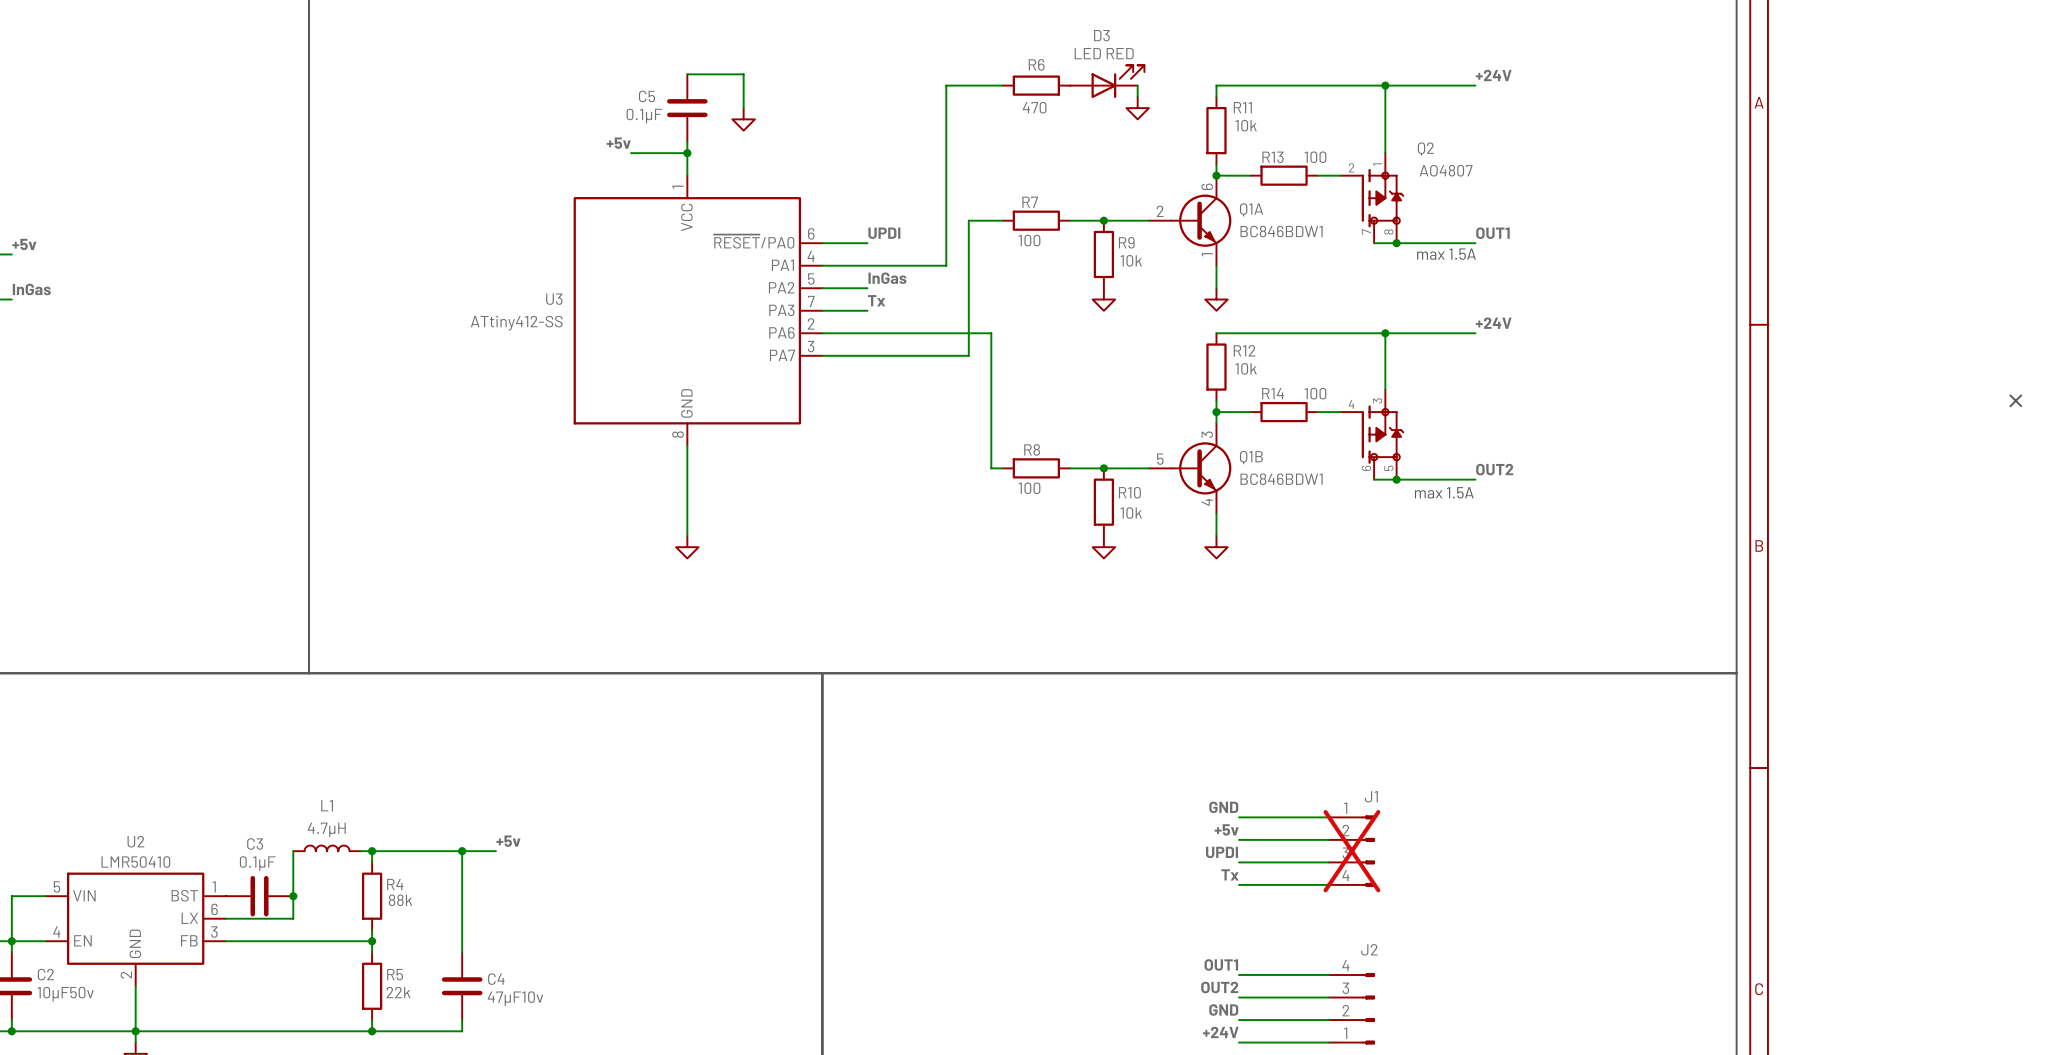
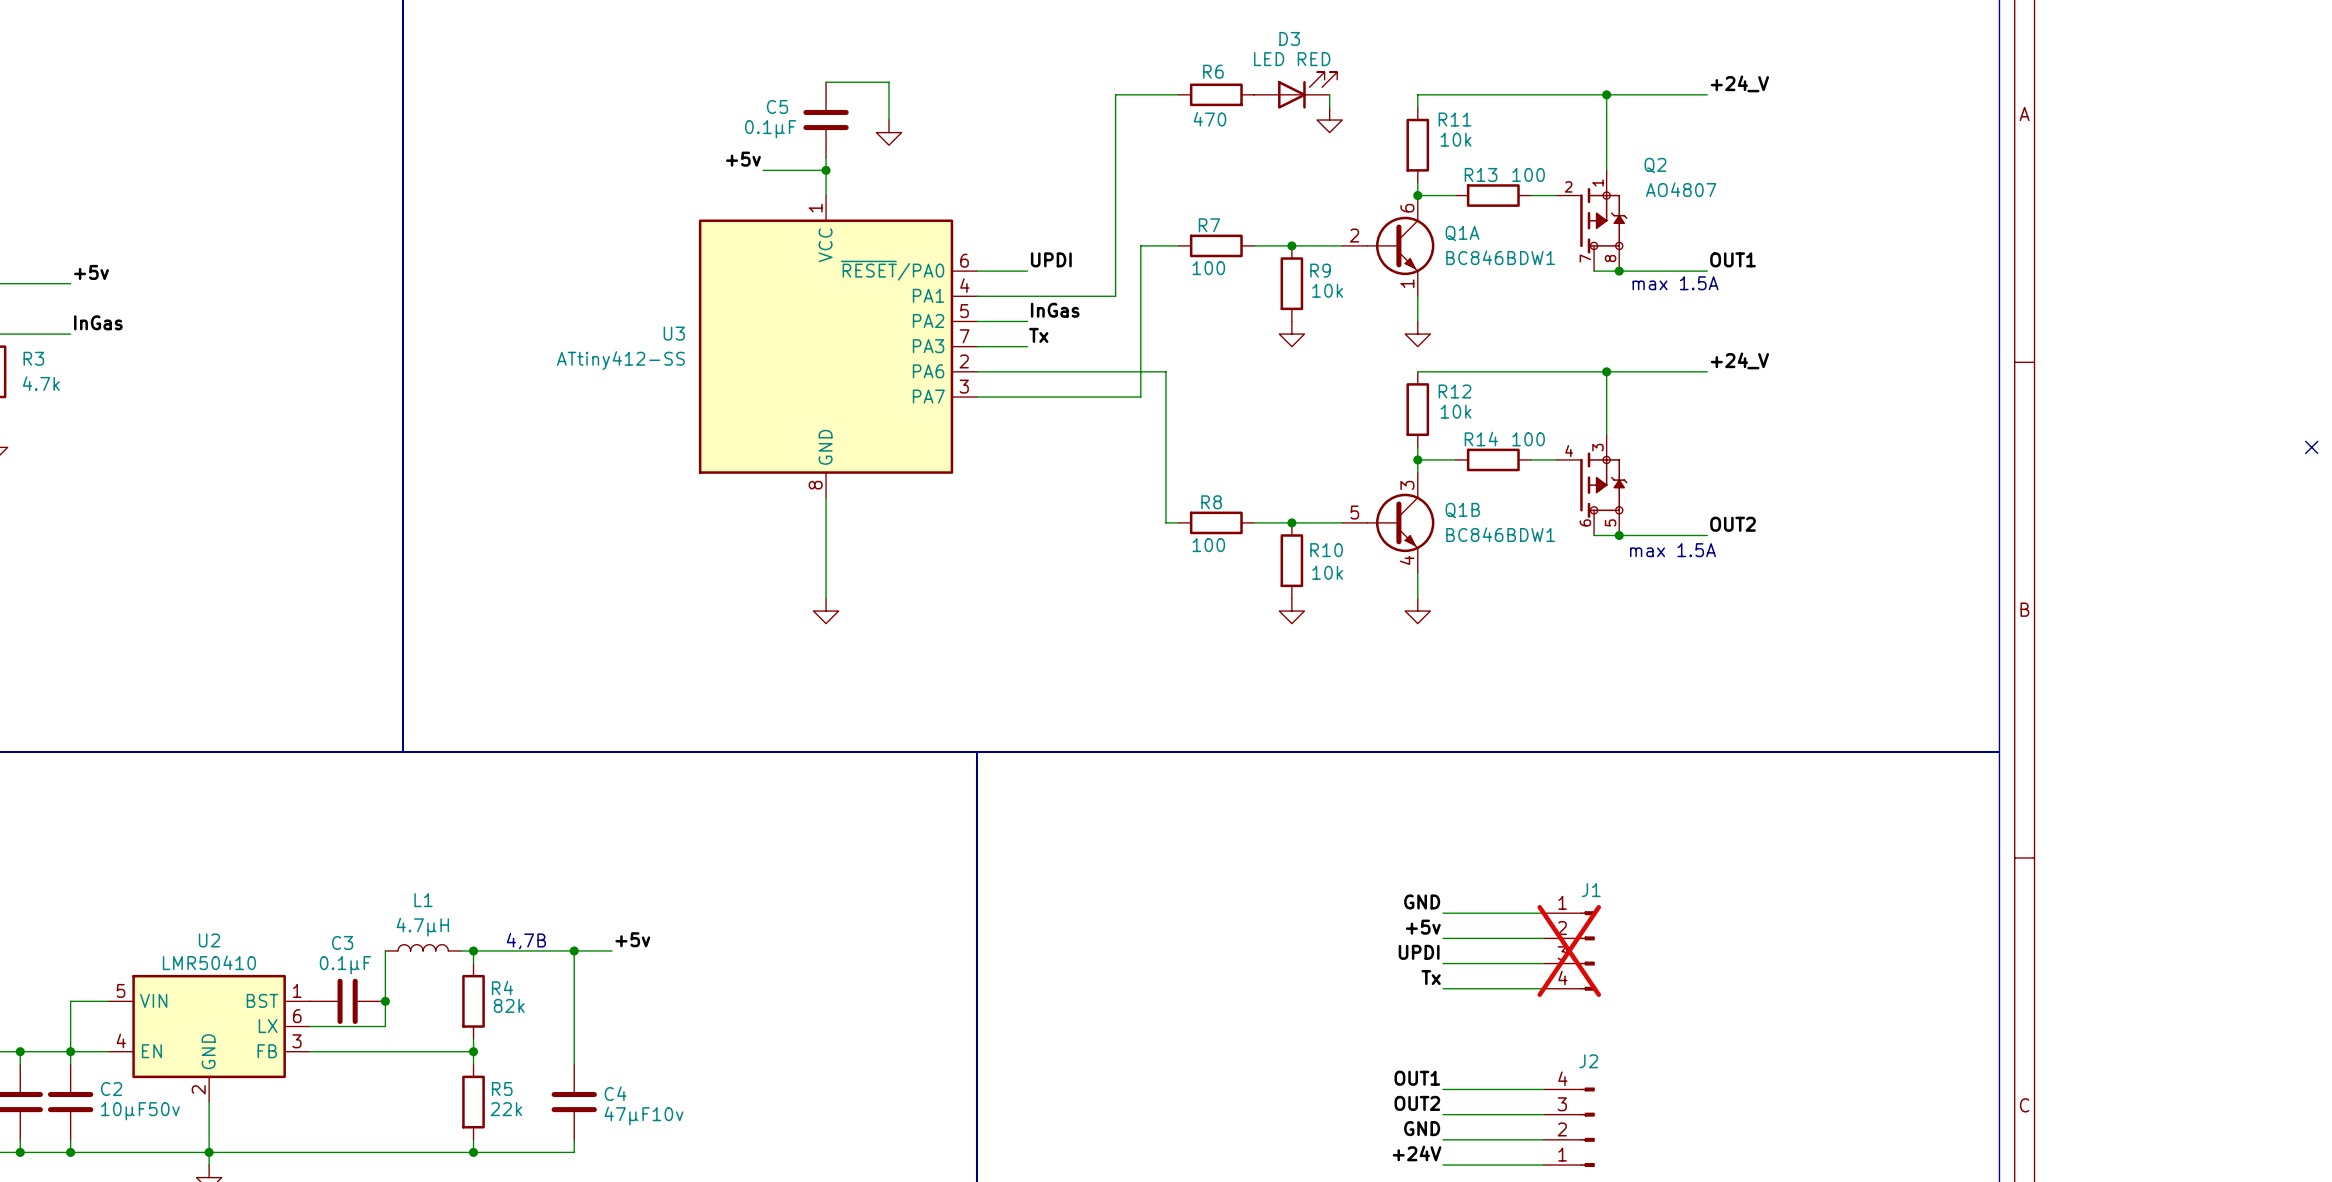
label: +24V (1493, 75) -> +24_V (1739, 83)
label: +24V (1493, 323) -> +24_V (1739, 360)
text: none -> 4,7В (526, 941)
R4 value: 88k (400, 900) -> 82k (509, 1005)

